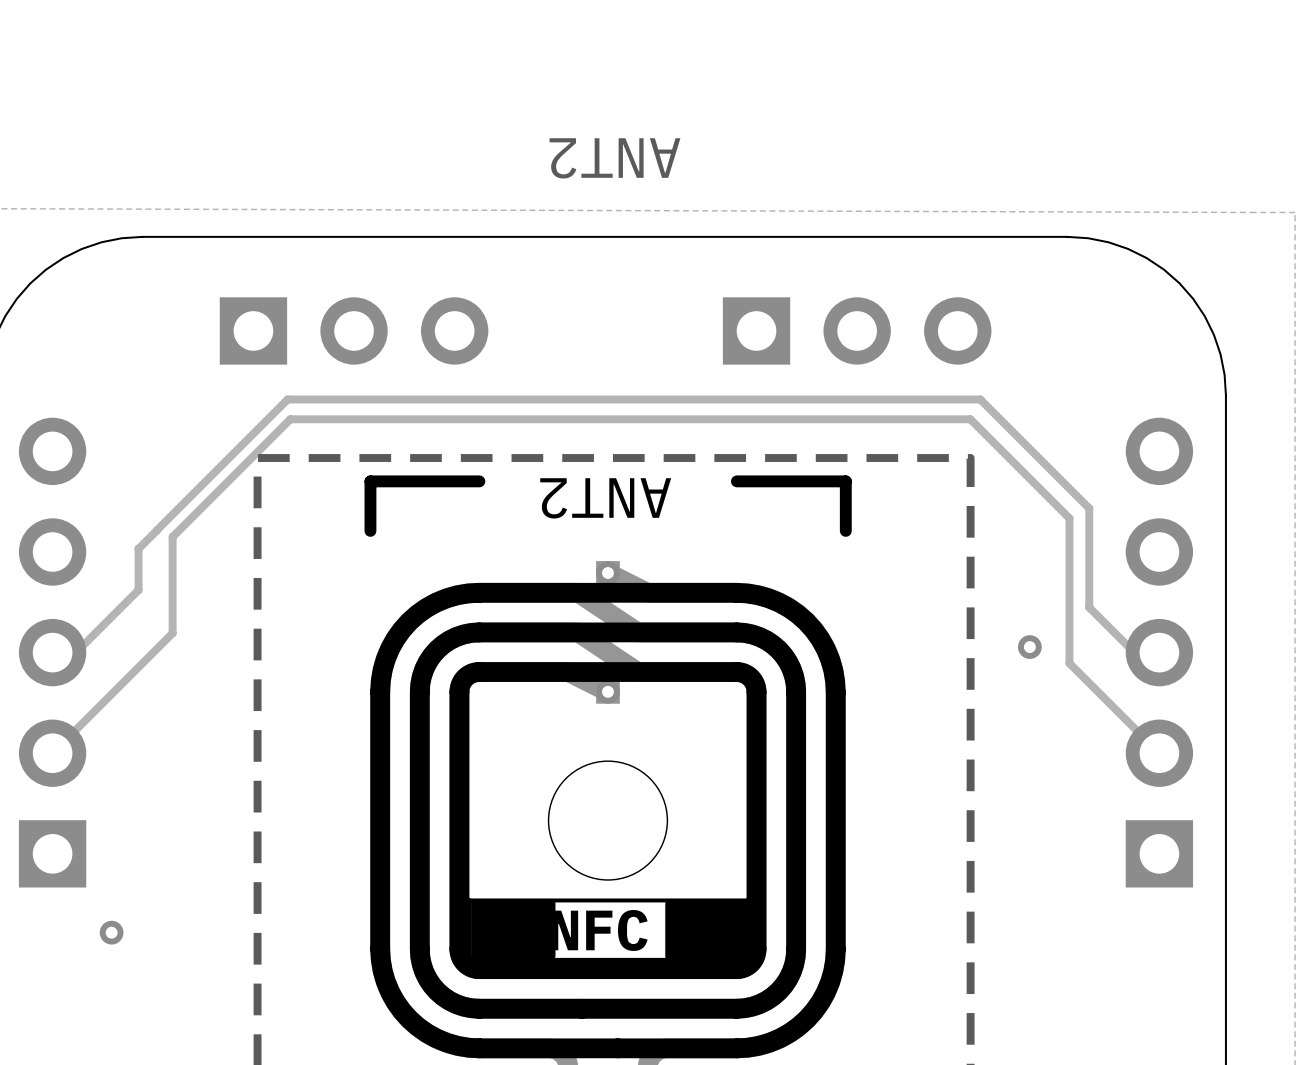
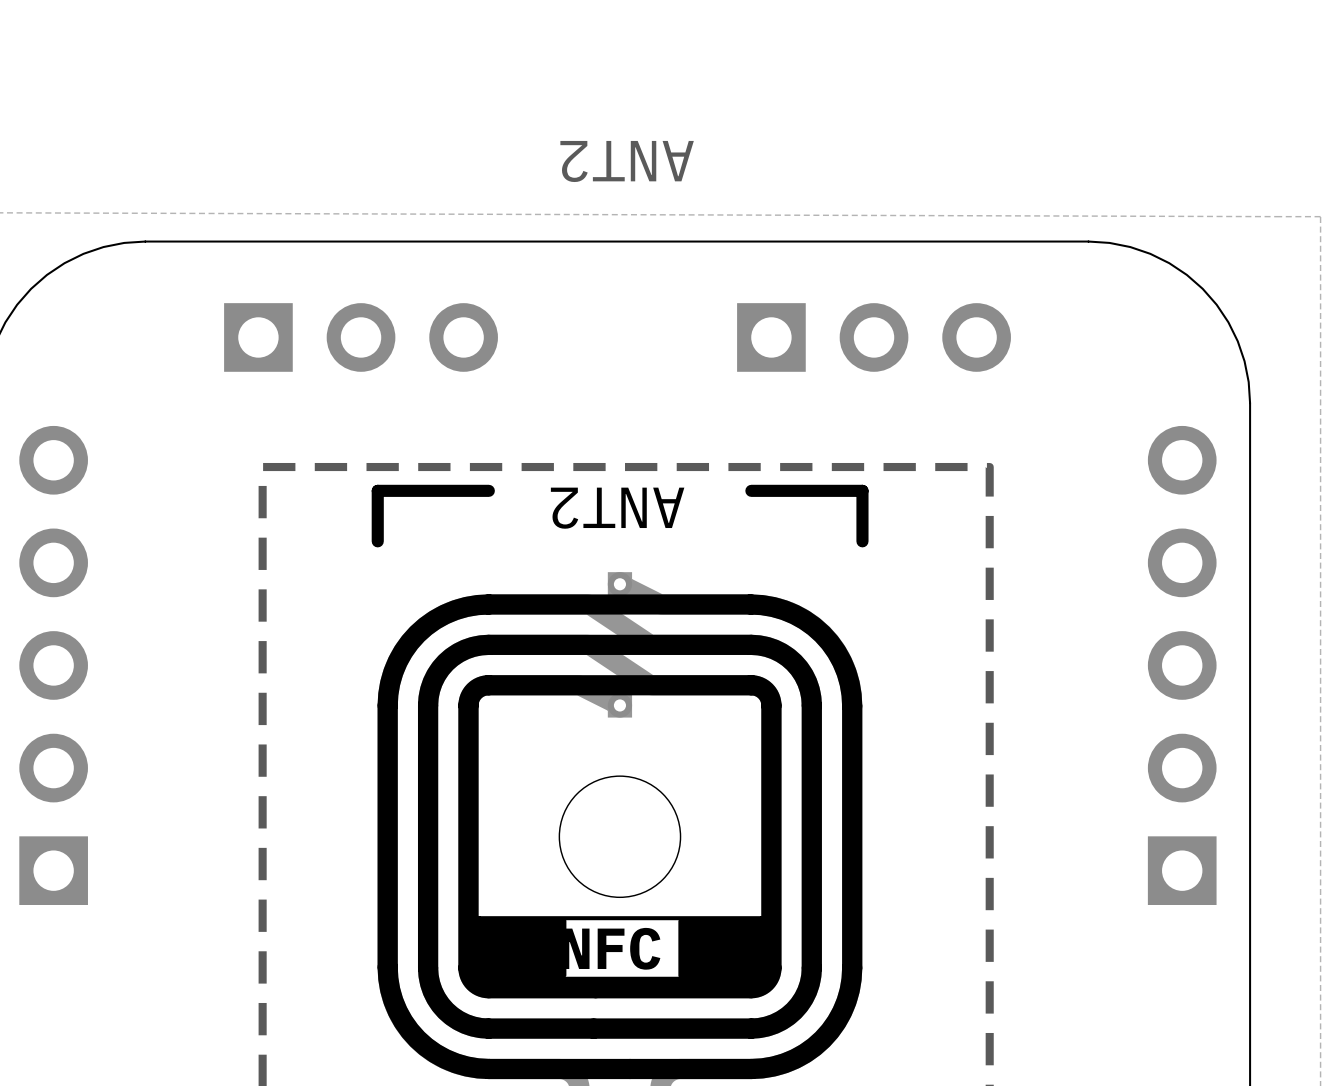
track: (156, 530) (287, 399) (980, 399) (1089, 508) (1089, 607) (1134, 652) (1159, 652) -> none
track: (156, 530) (138, 548) (138, 590) (75, 652) (52, 652) -> none
via: (1029, 647) -> none
track: (1159, 753) (1069, 663) (1069, 518) (970, 419) (290, 419) (172, 536) (172, 633) (52, 753) -> none
via: (111, 932) -> none

